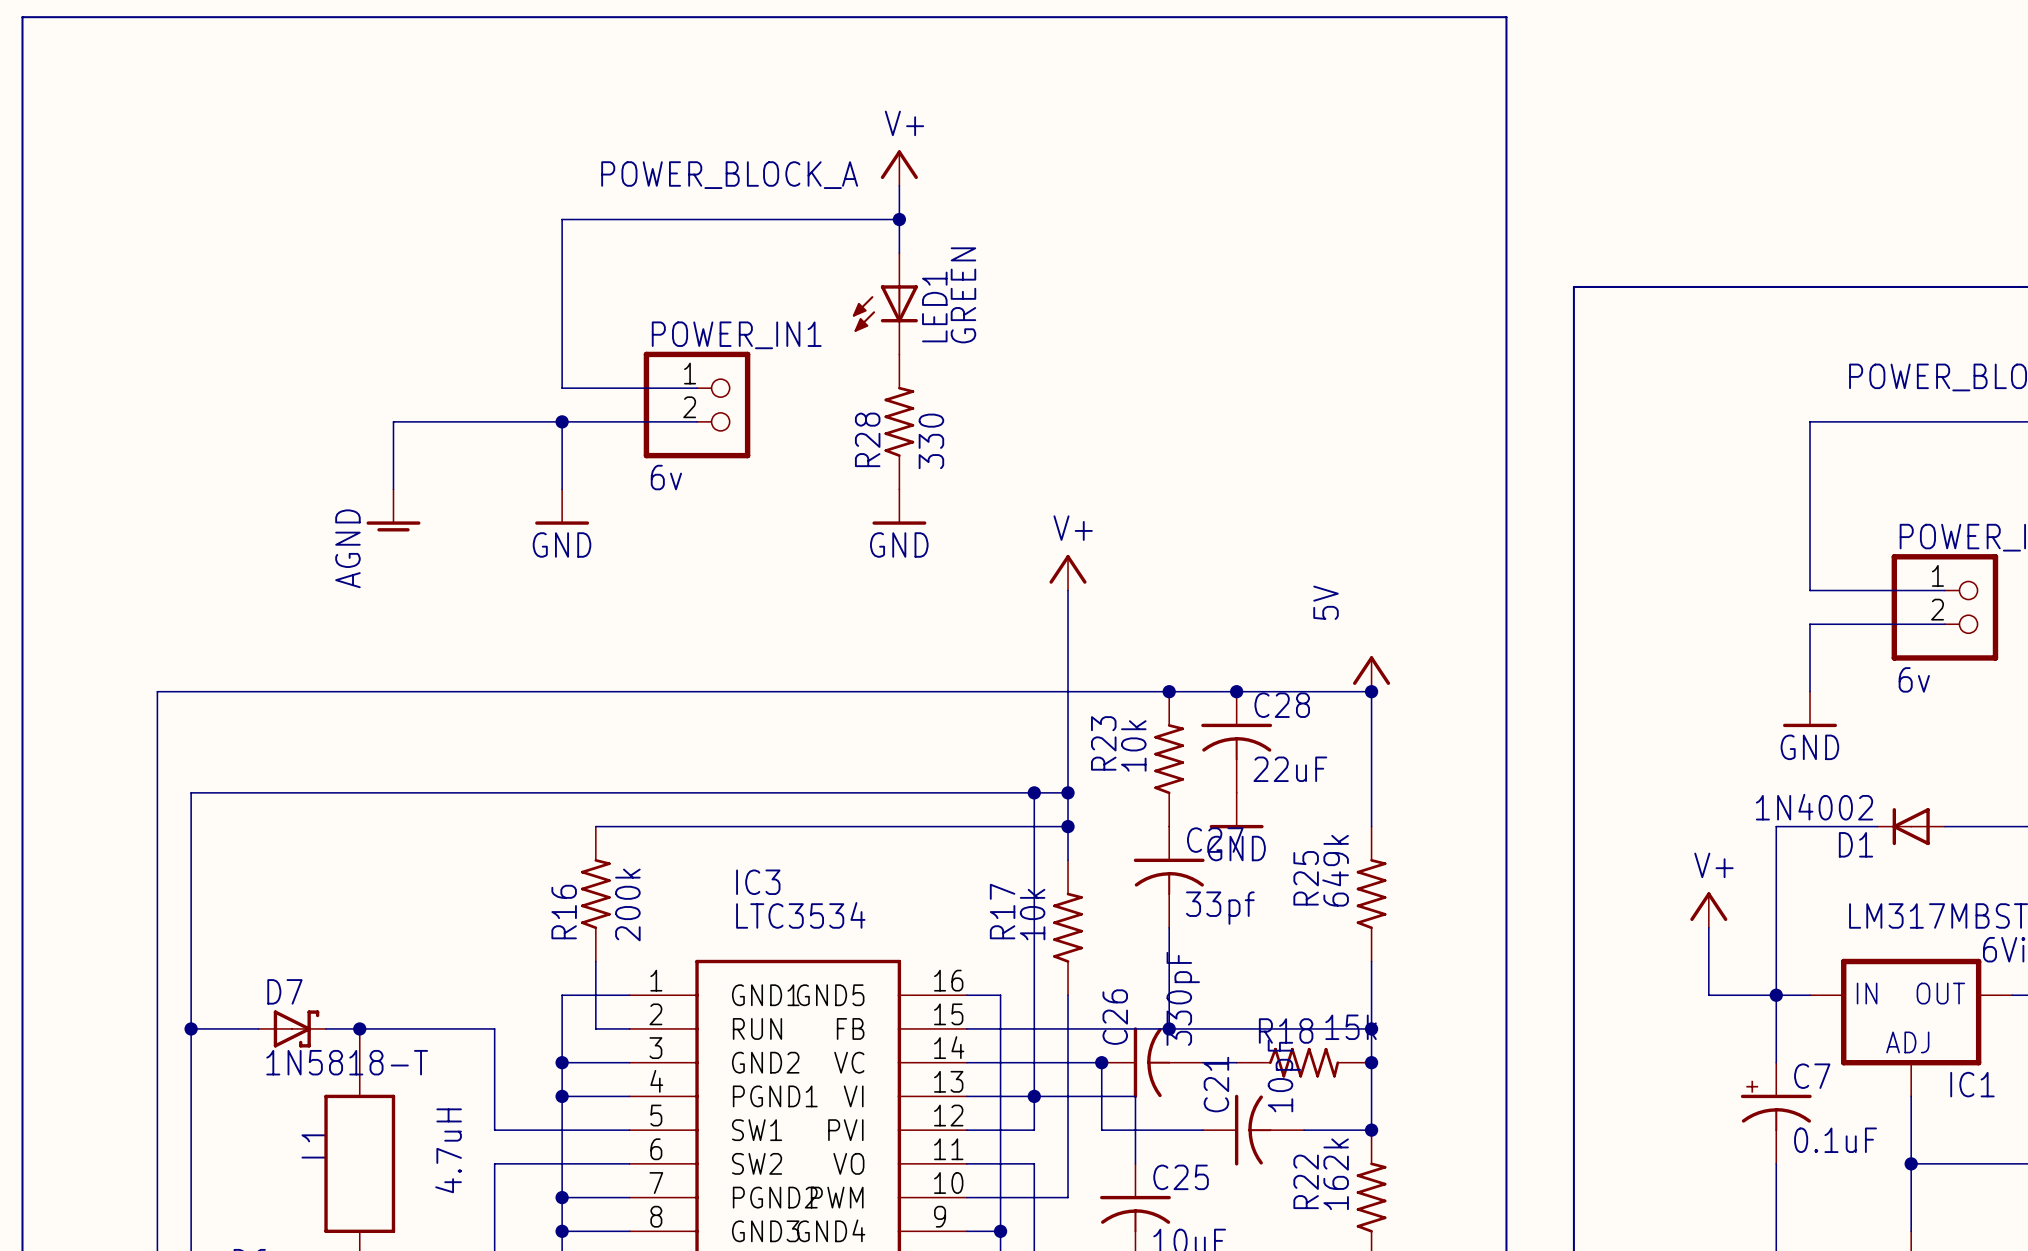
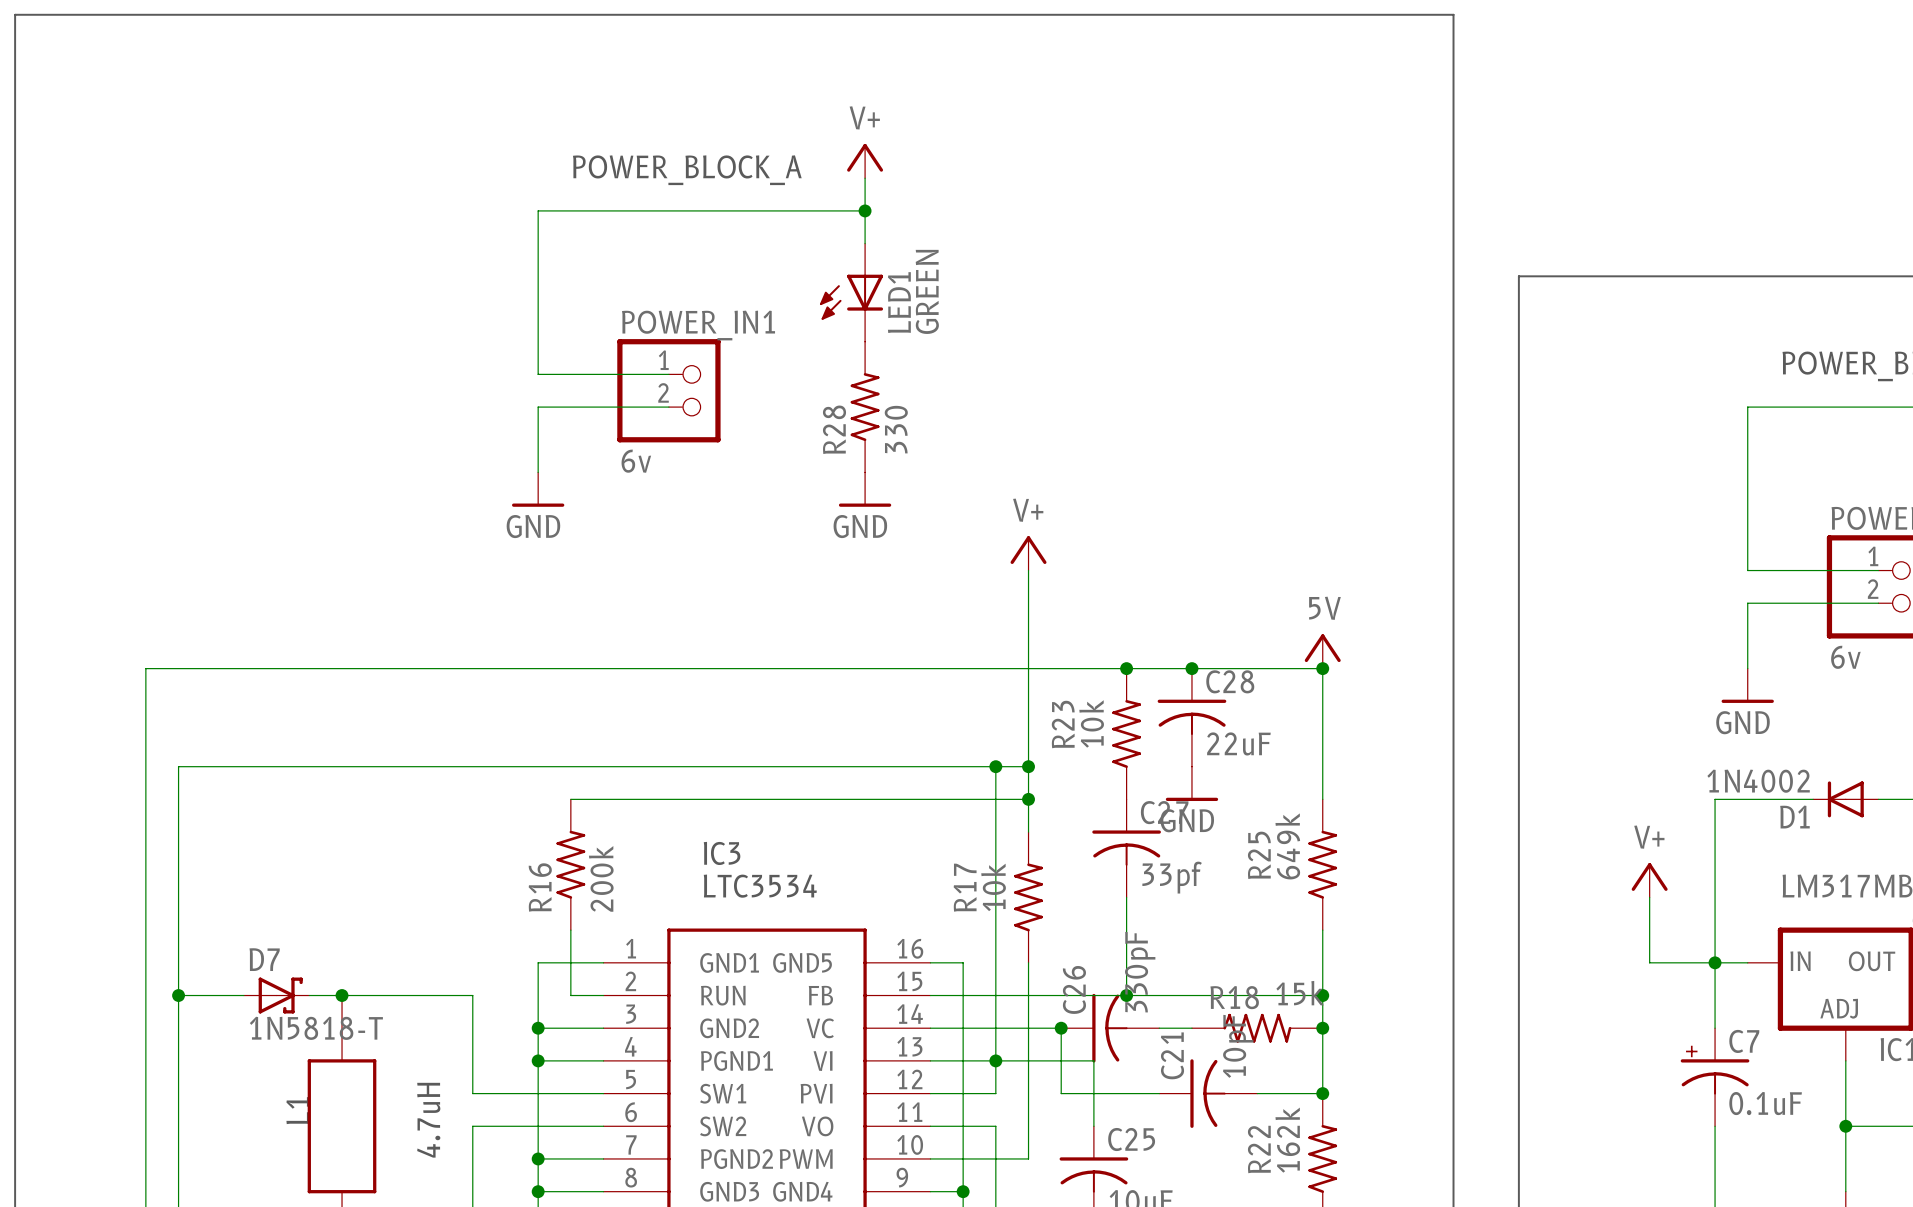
wire: (562, 421) (393, 421) (393, 489) -> none
junction: (562, 421) -> none
power symbol: AGND (393, 510) -> none
power symbol text rotation: 0° (1326, 602) -> 90° clockwise (1324, 608)
power symbol text position: 5V (1326, 602) -> 5V (1324, 608)

